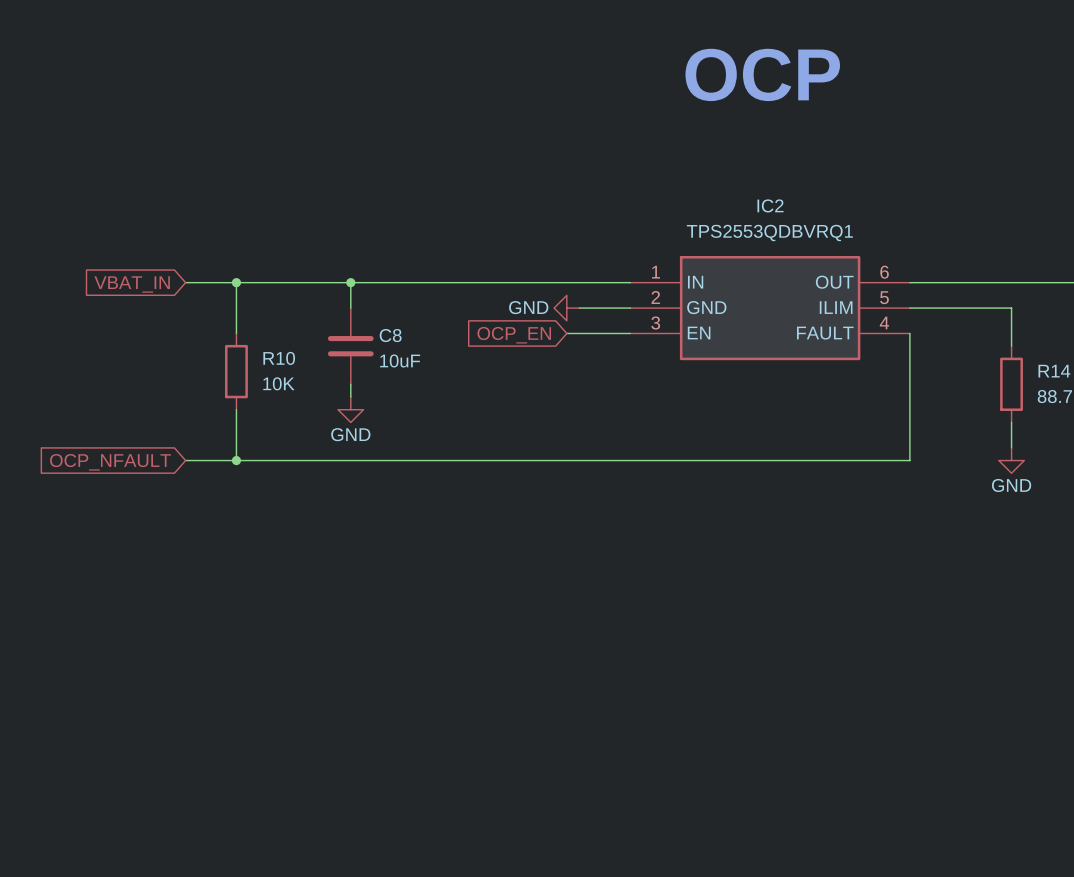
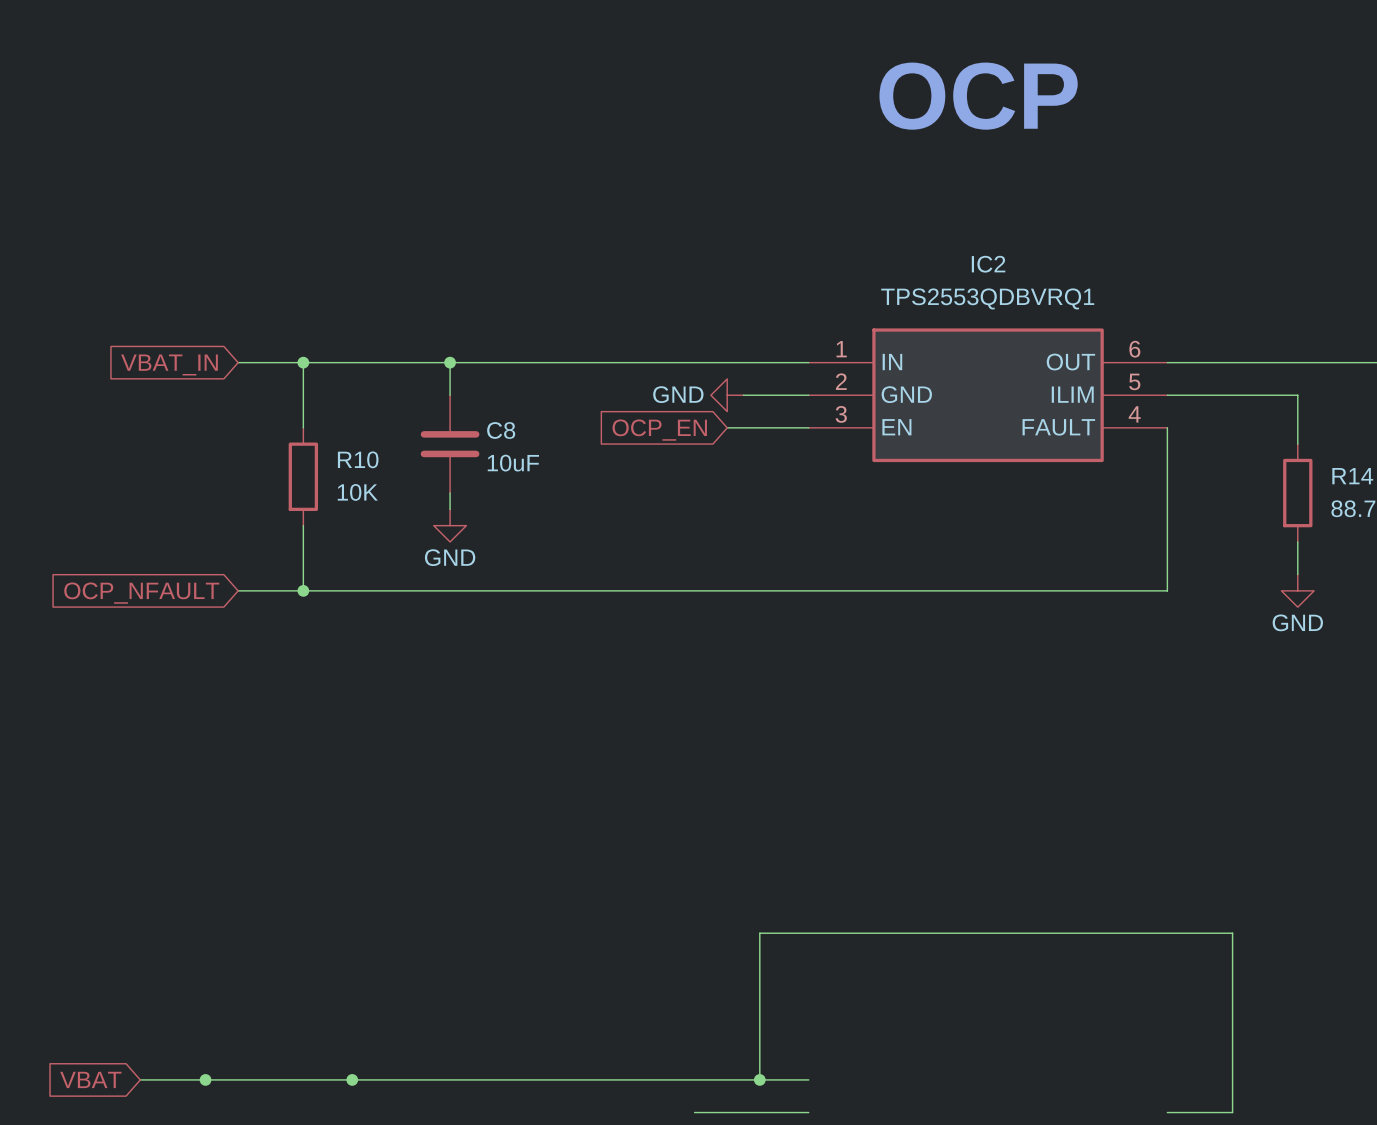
global label: none -> VBAT (90, 1079)
wire: none -> (140, 1079) (808, 1079)
junction: none -> (205, 1079)
junction: none -> (352, 1079)
wire: none -> (759, 1079) (759, 933) (1232, 933) (1232, 1112) (1167, 1112)
junction: none -> (759, 1079)
wire: none -> (694, 1112) (808, 1112)

